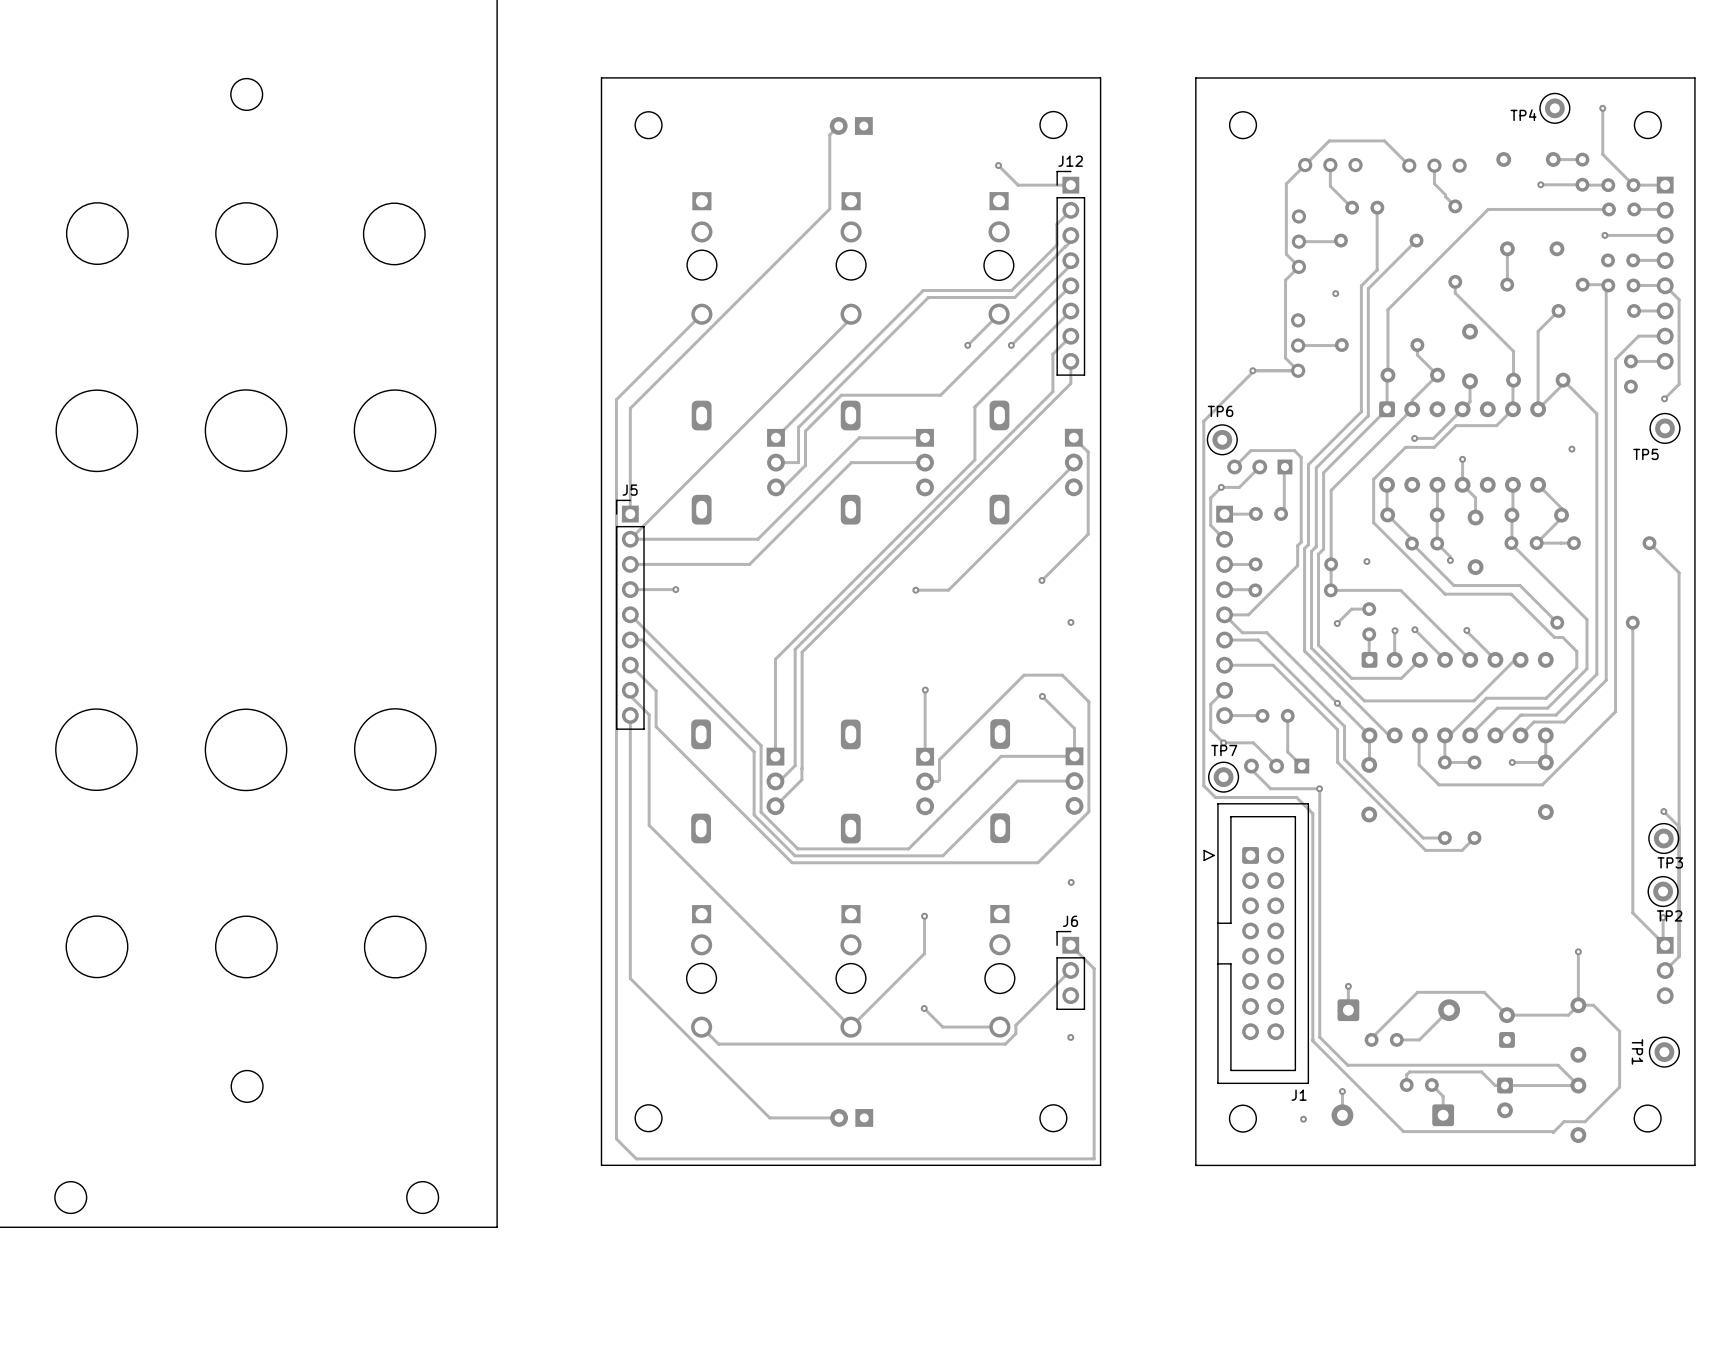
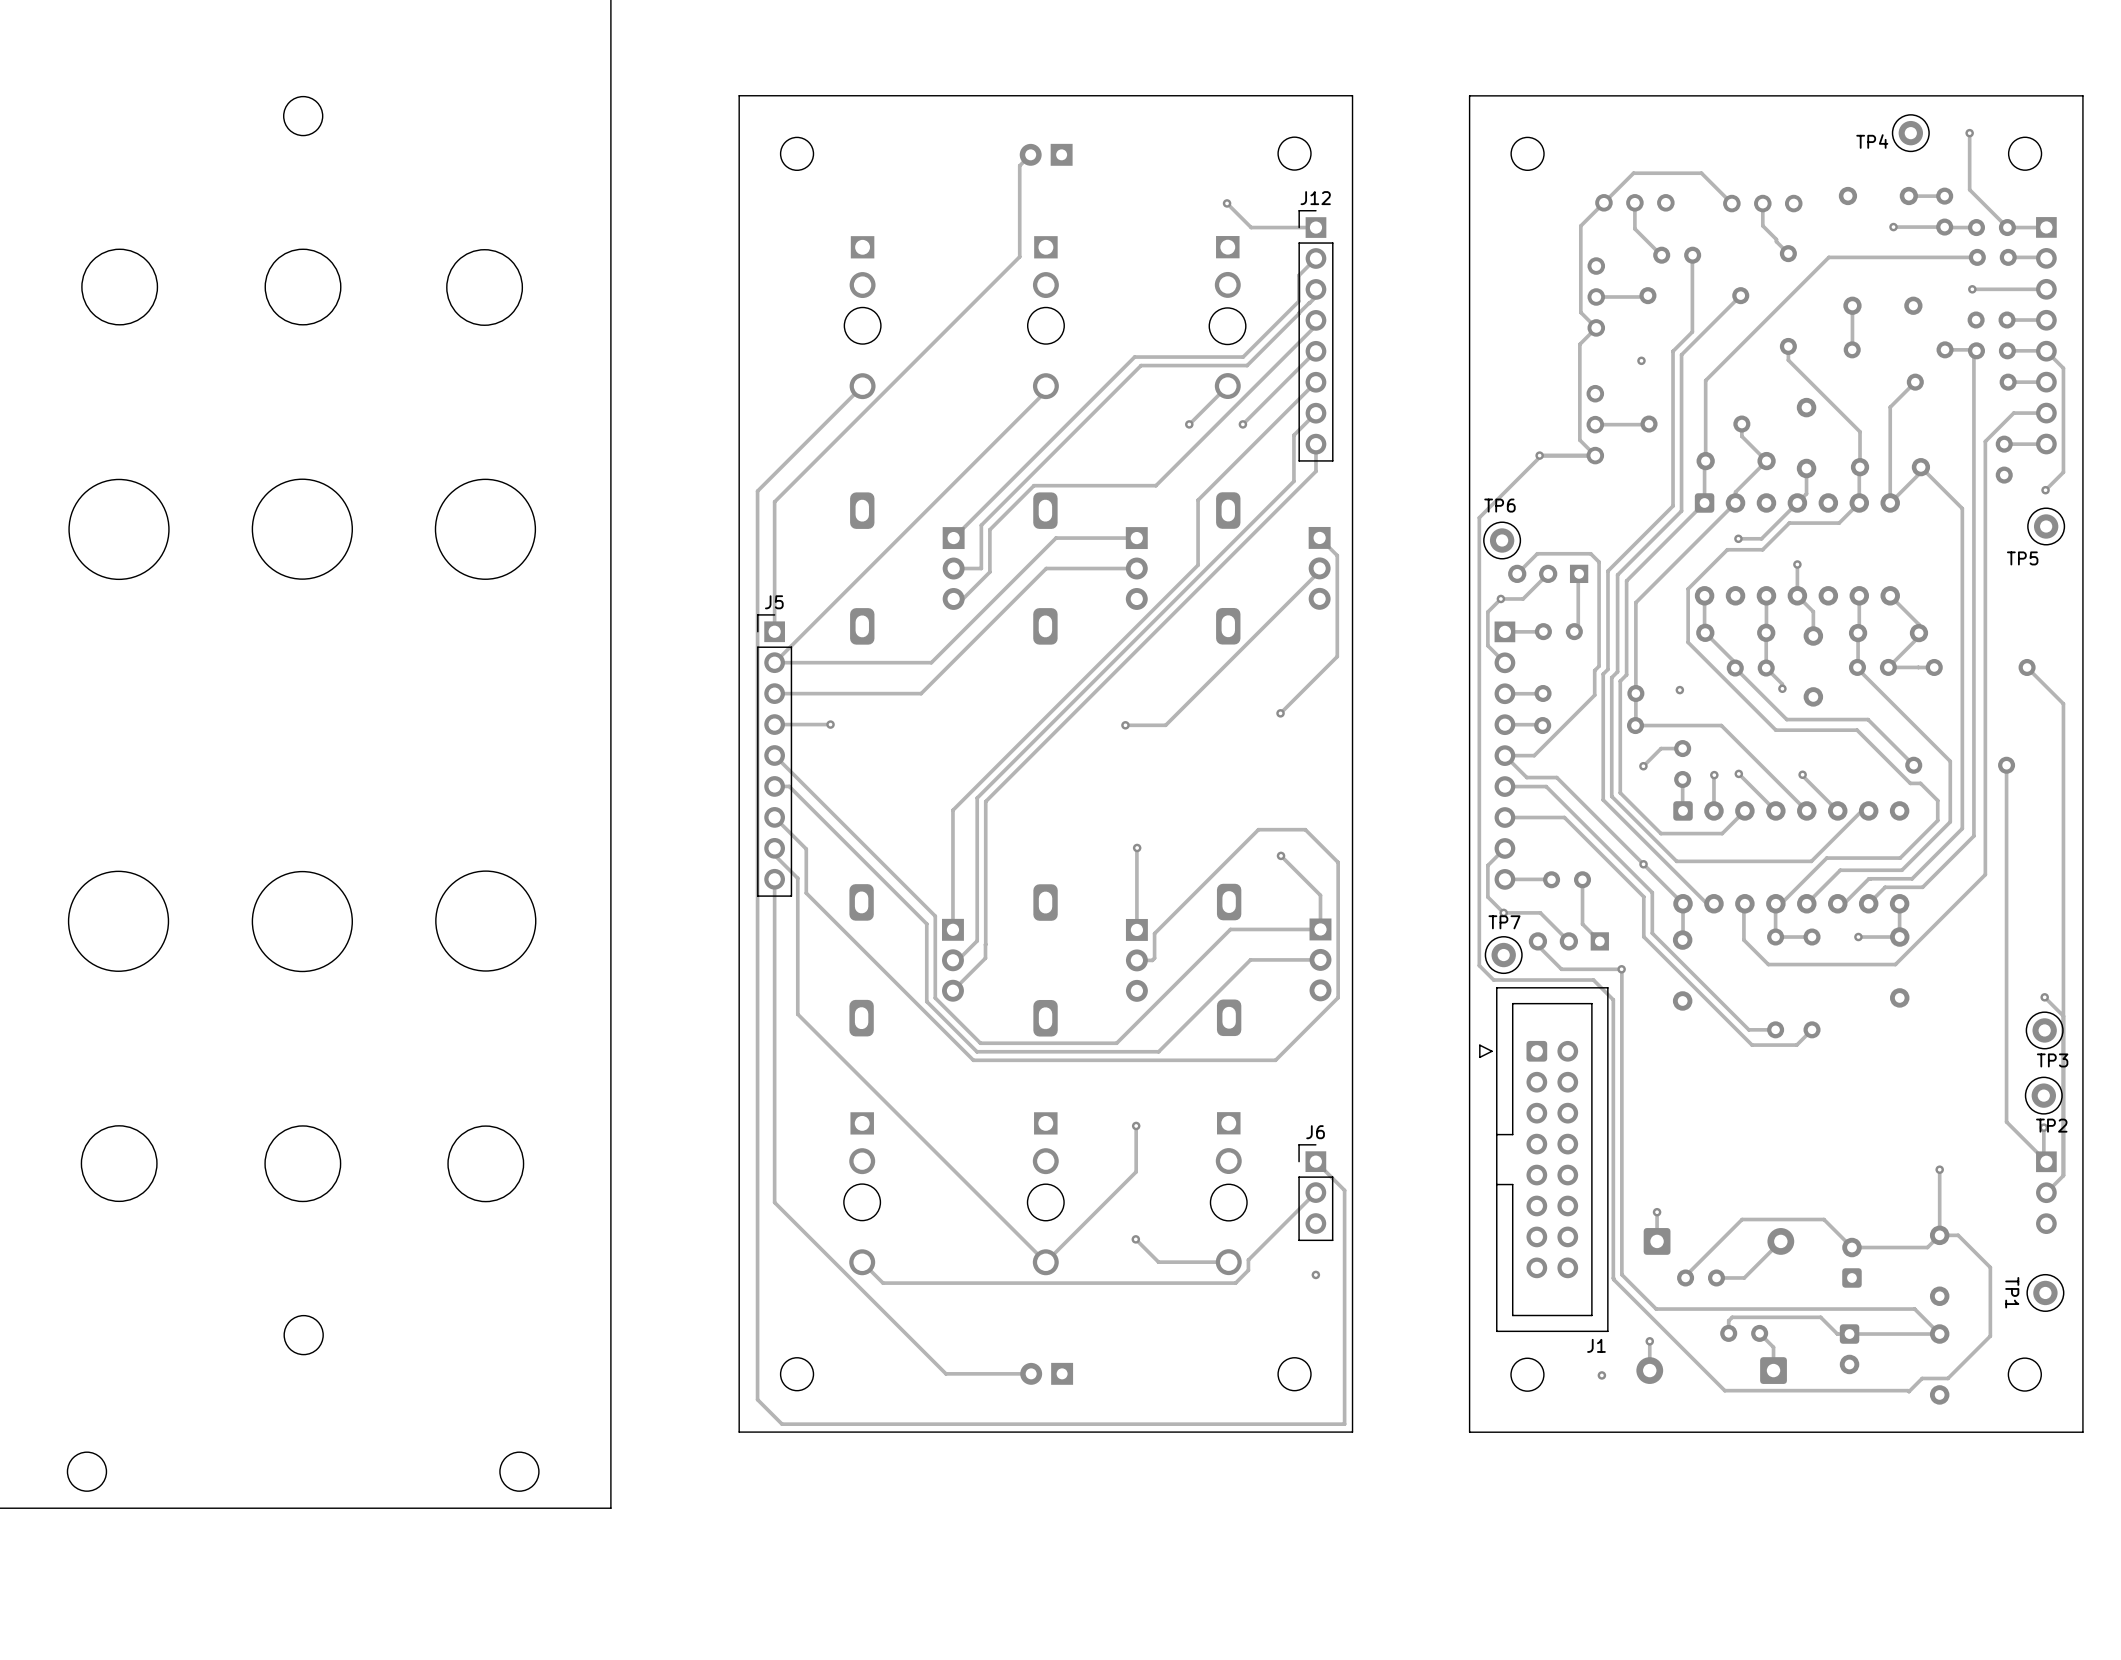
via: (1571, 449) -> none
via: (1070, 622) -> none
via: (1071, 882) -> none

